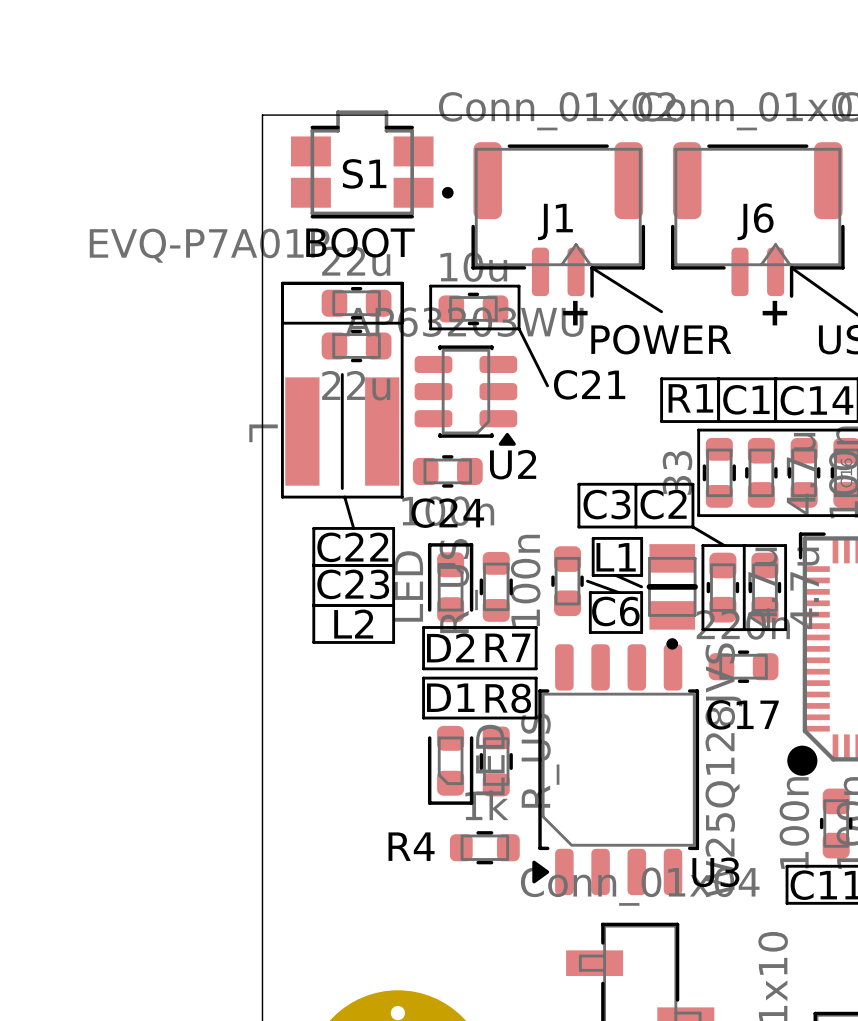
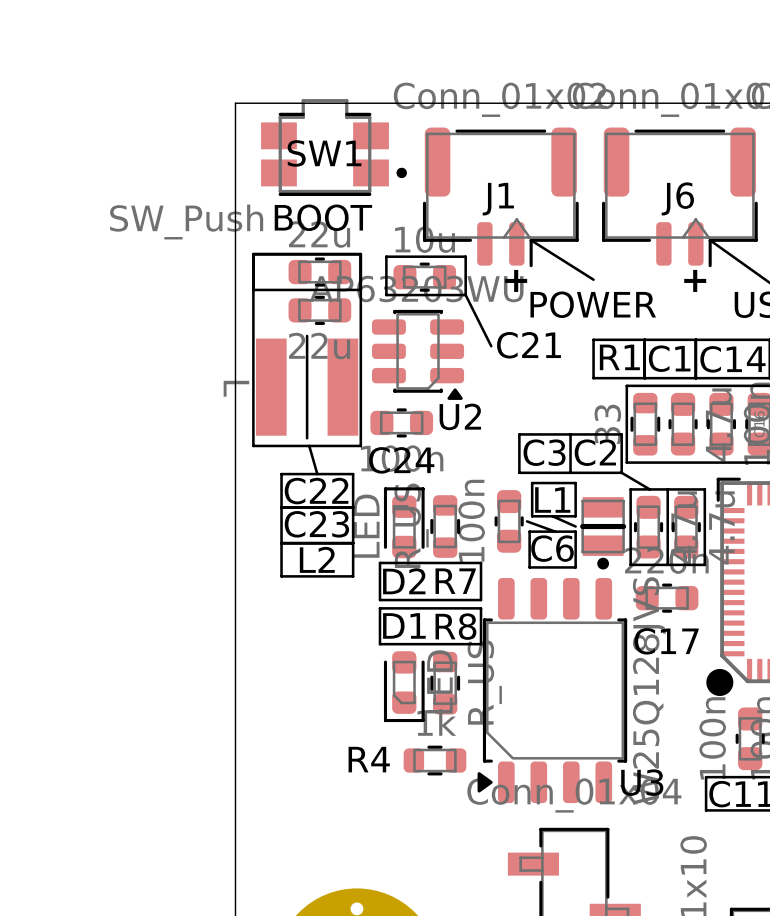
S1 name: S1 (364, 173) -> SW1 (324, 153)
S1 value: EVQ-P7A01P (209, 245) -> SW_Push (186, 221)
L1 footprint: [646, 544, 698, 650] -> [580, 497, 627, 570]

